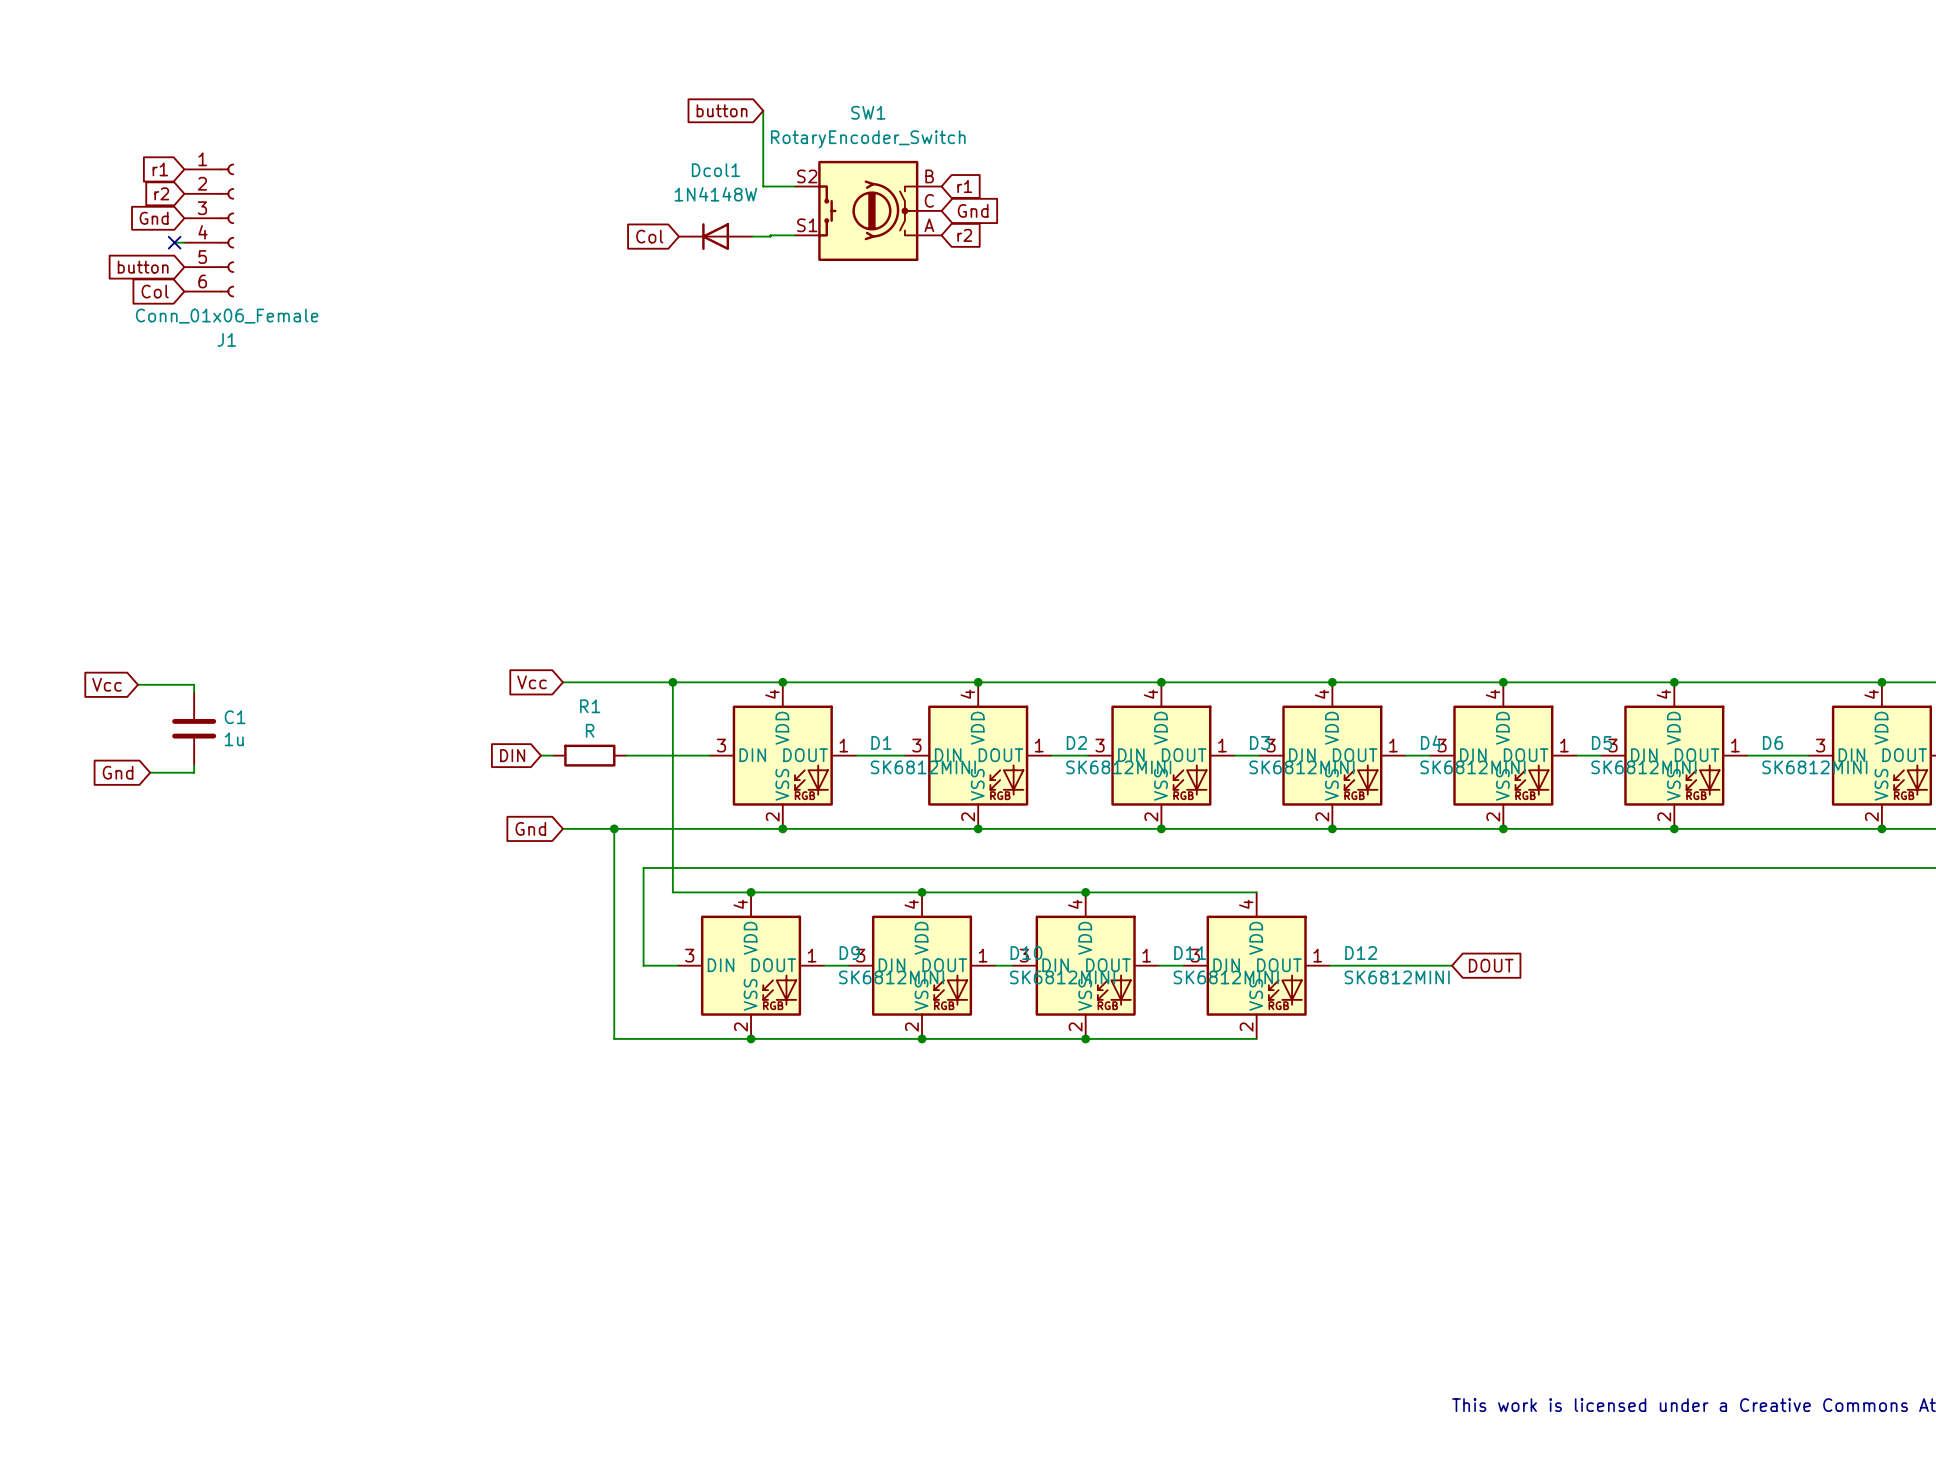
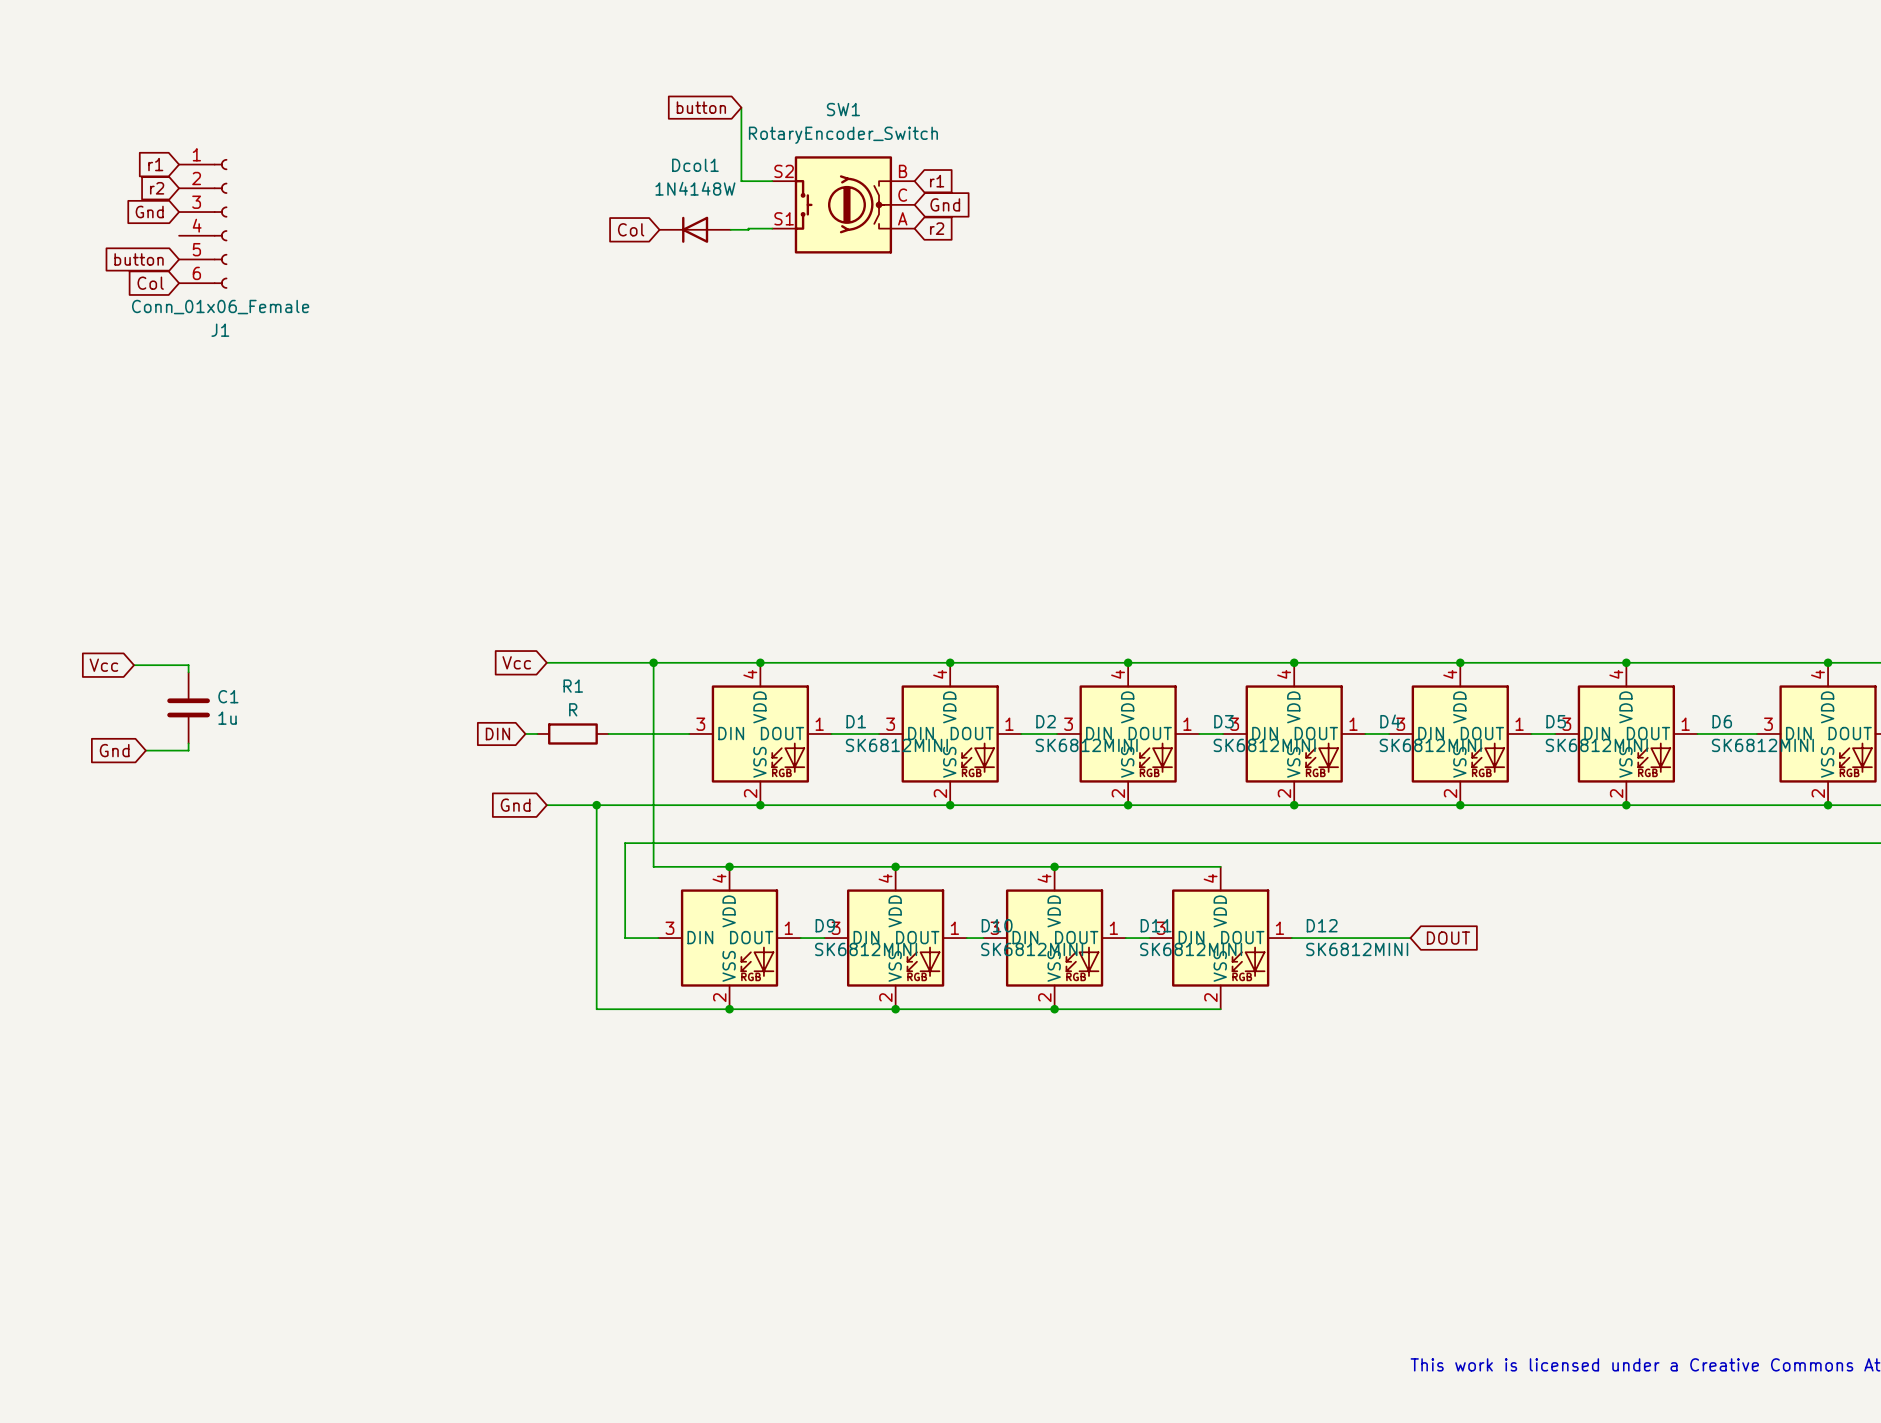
wire: (174, 242) (184, 242) -> none
no-connect mark: (174, 242) -> none

